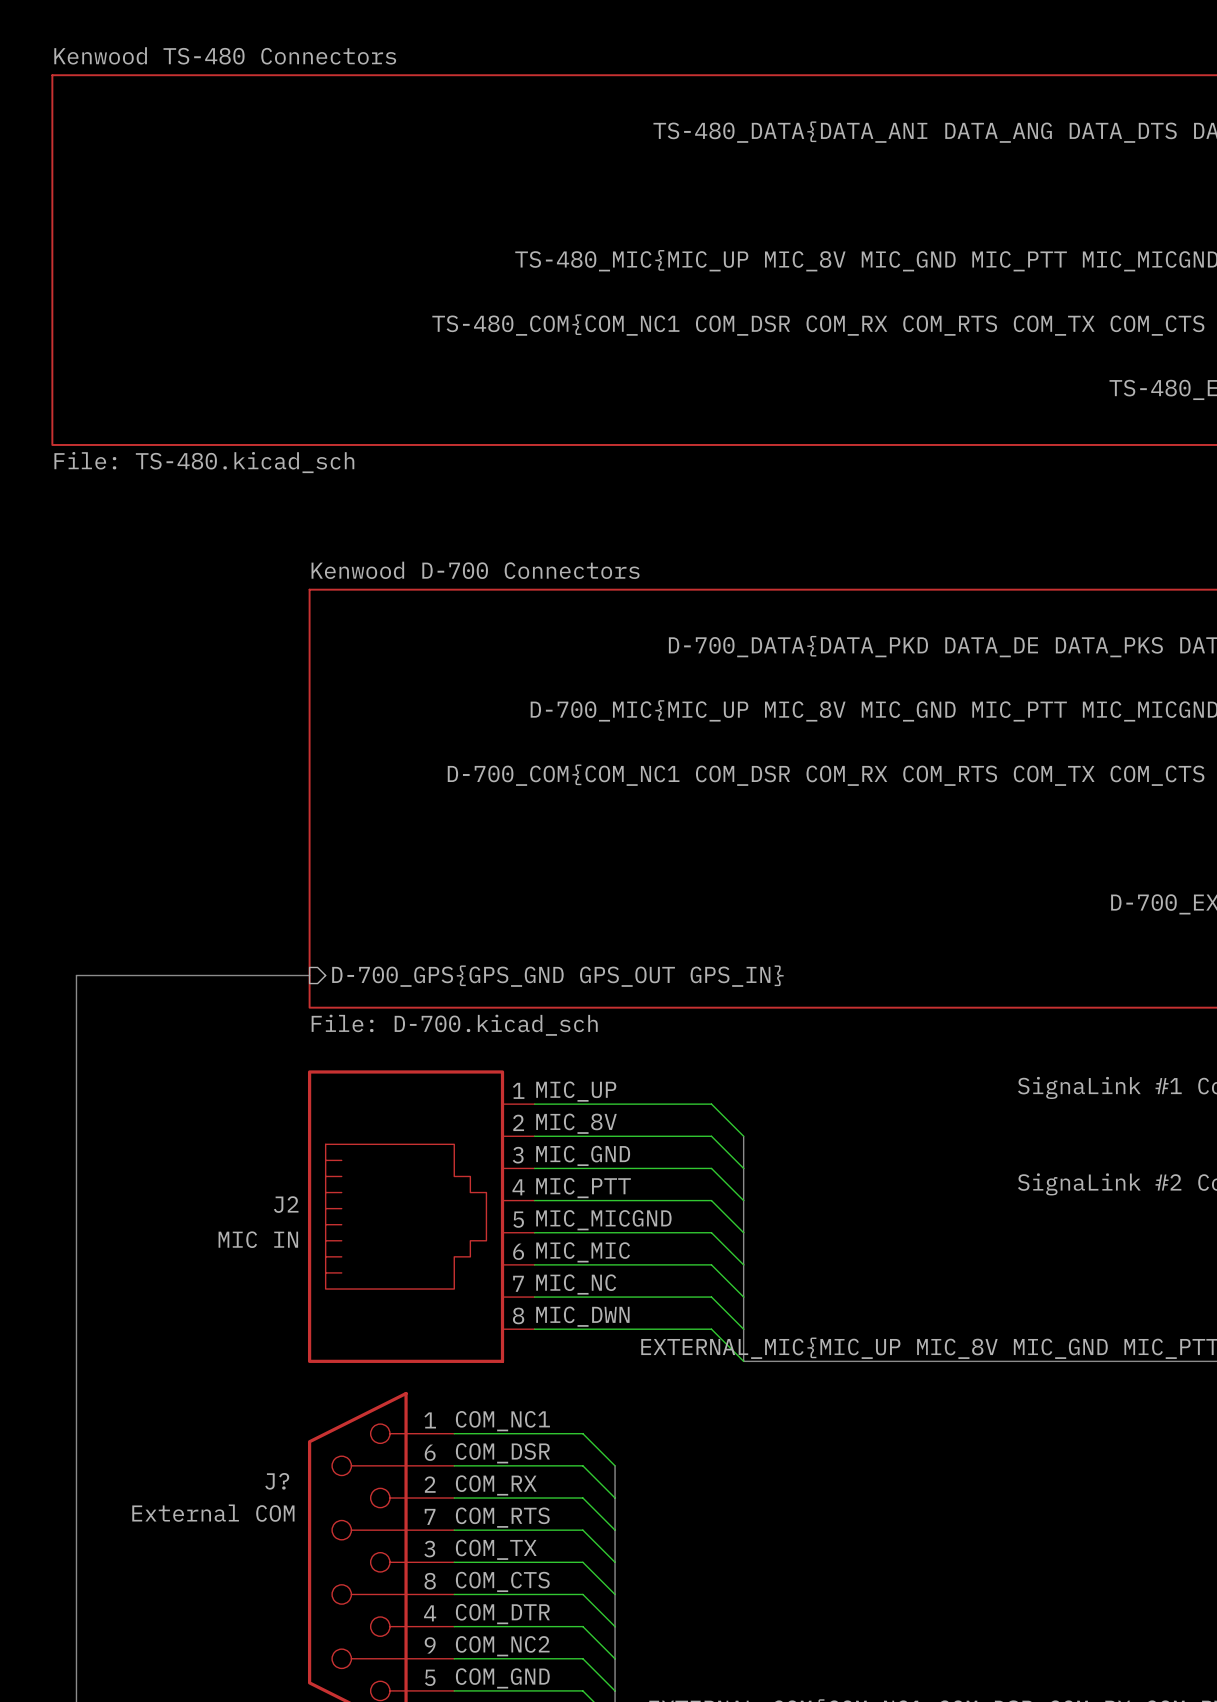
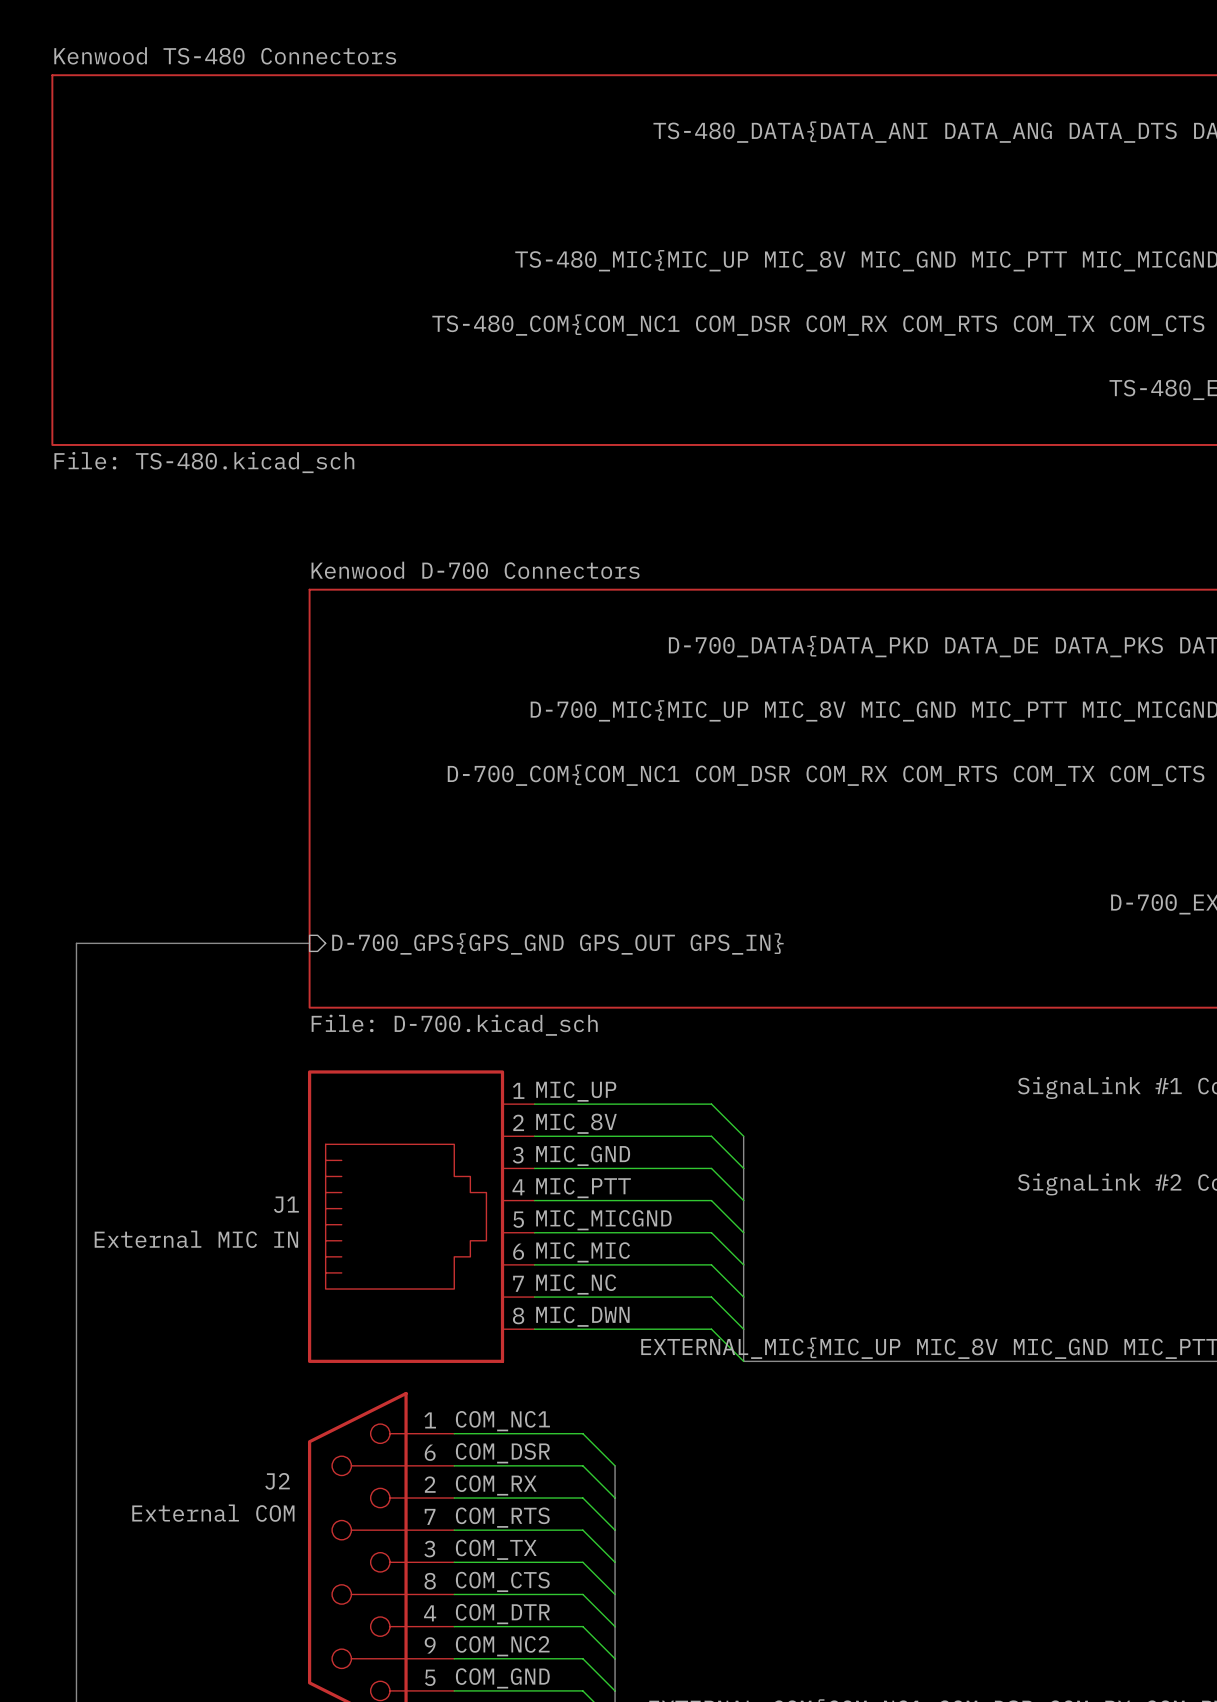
bus: (76, 975) (309, 975) -> (76, 975) (76, 943) (309, 943)
sheet pin position: D-700_GPS{GPS_GND GPS_OUT GPS_IN} (557, 976) -> D-700_GPS{GPS_GND GPS_OUT GPS_IN} (557, 943)
J2 name: J2 (286, 1204) -> J1 (286, 1204)
J2 value: MIC IN (258, 1239) -> External MIC IN (196, 1239)
J? name: J? (277, 1481) -> J2 (277, 1481)

